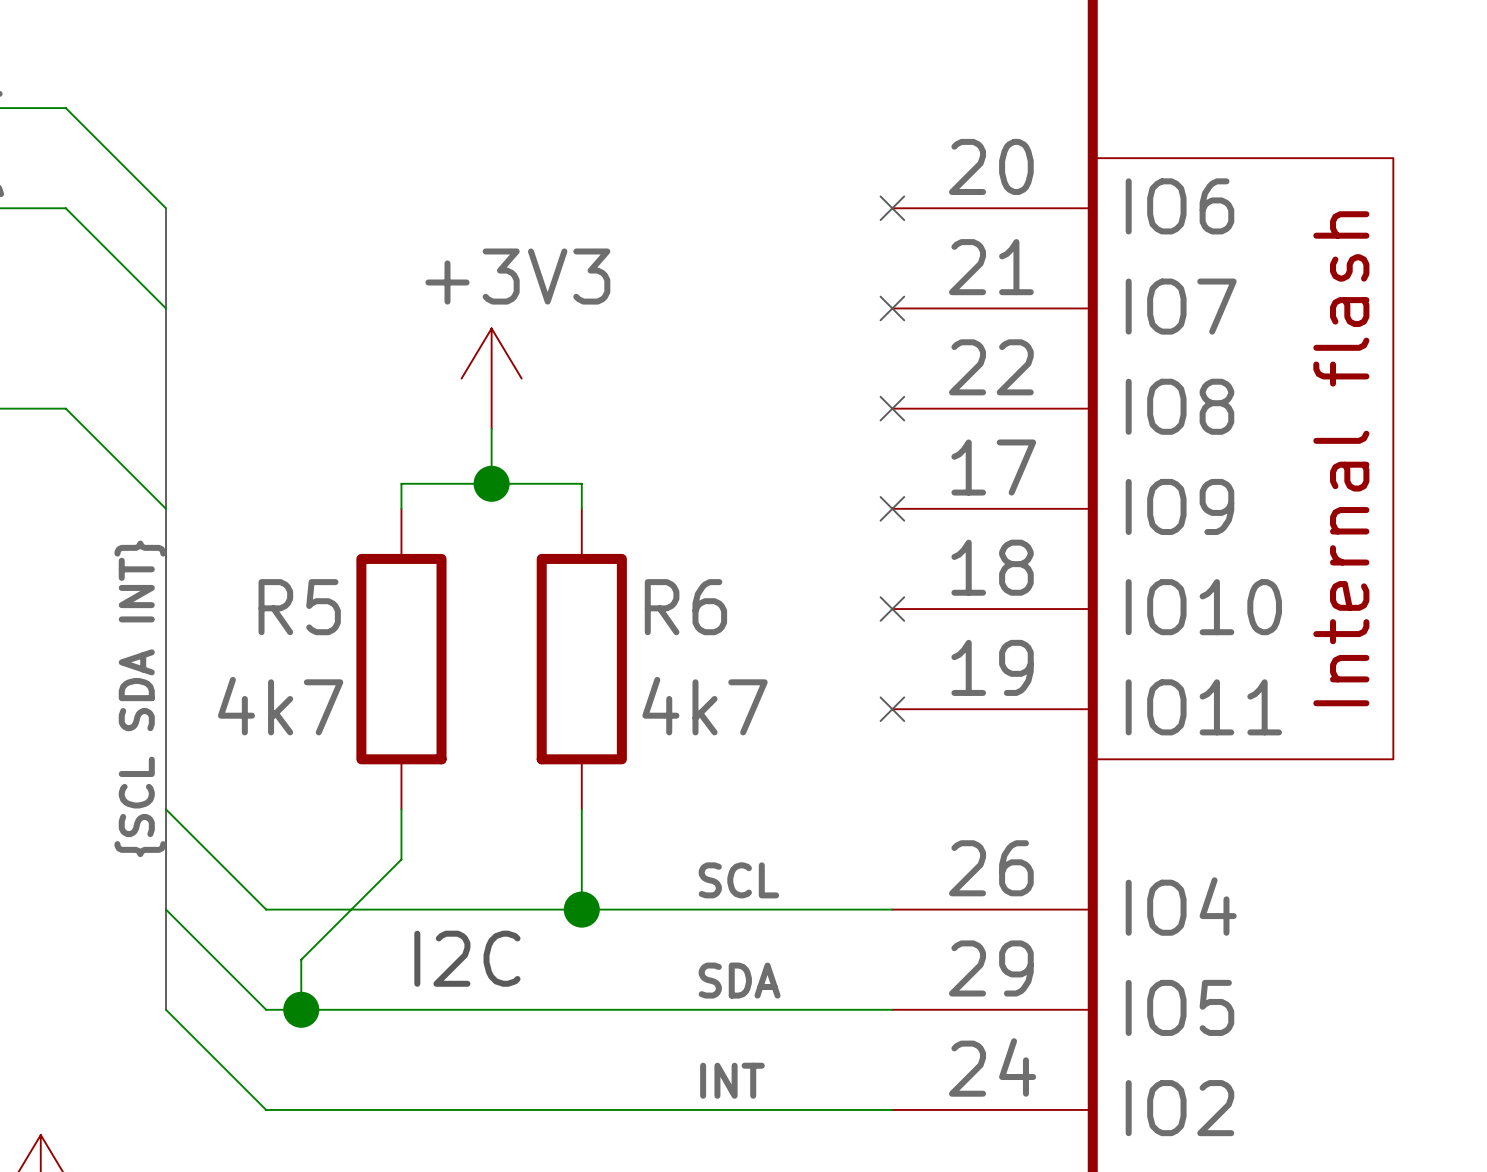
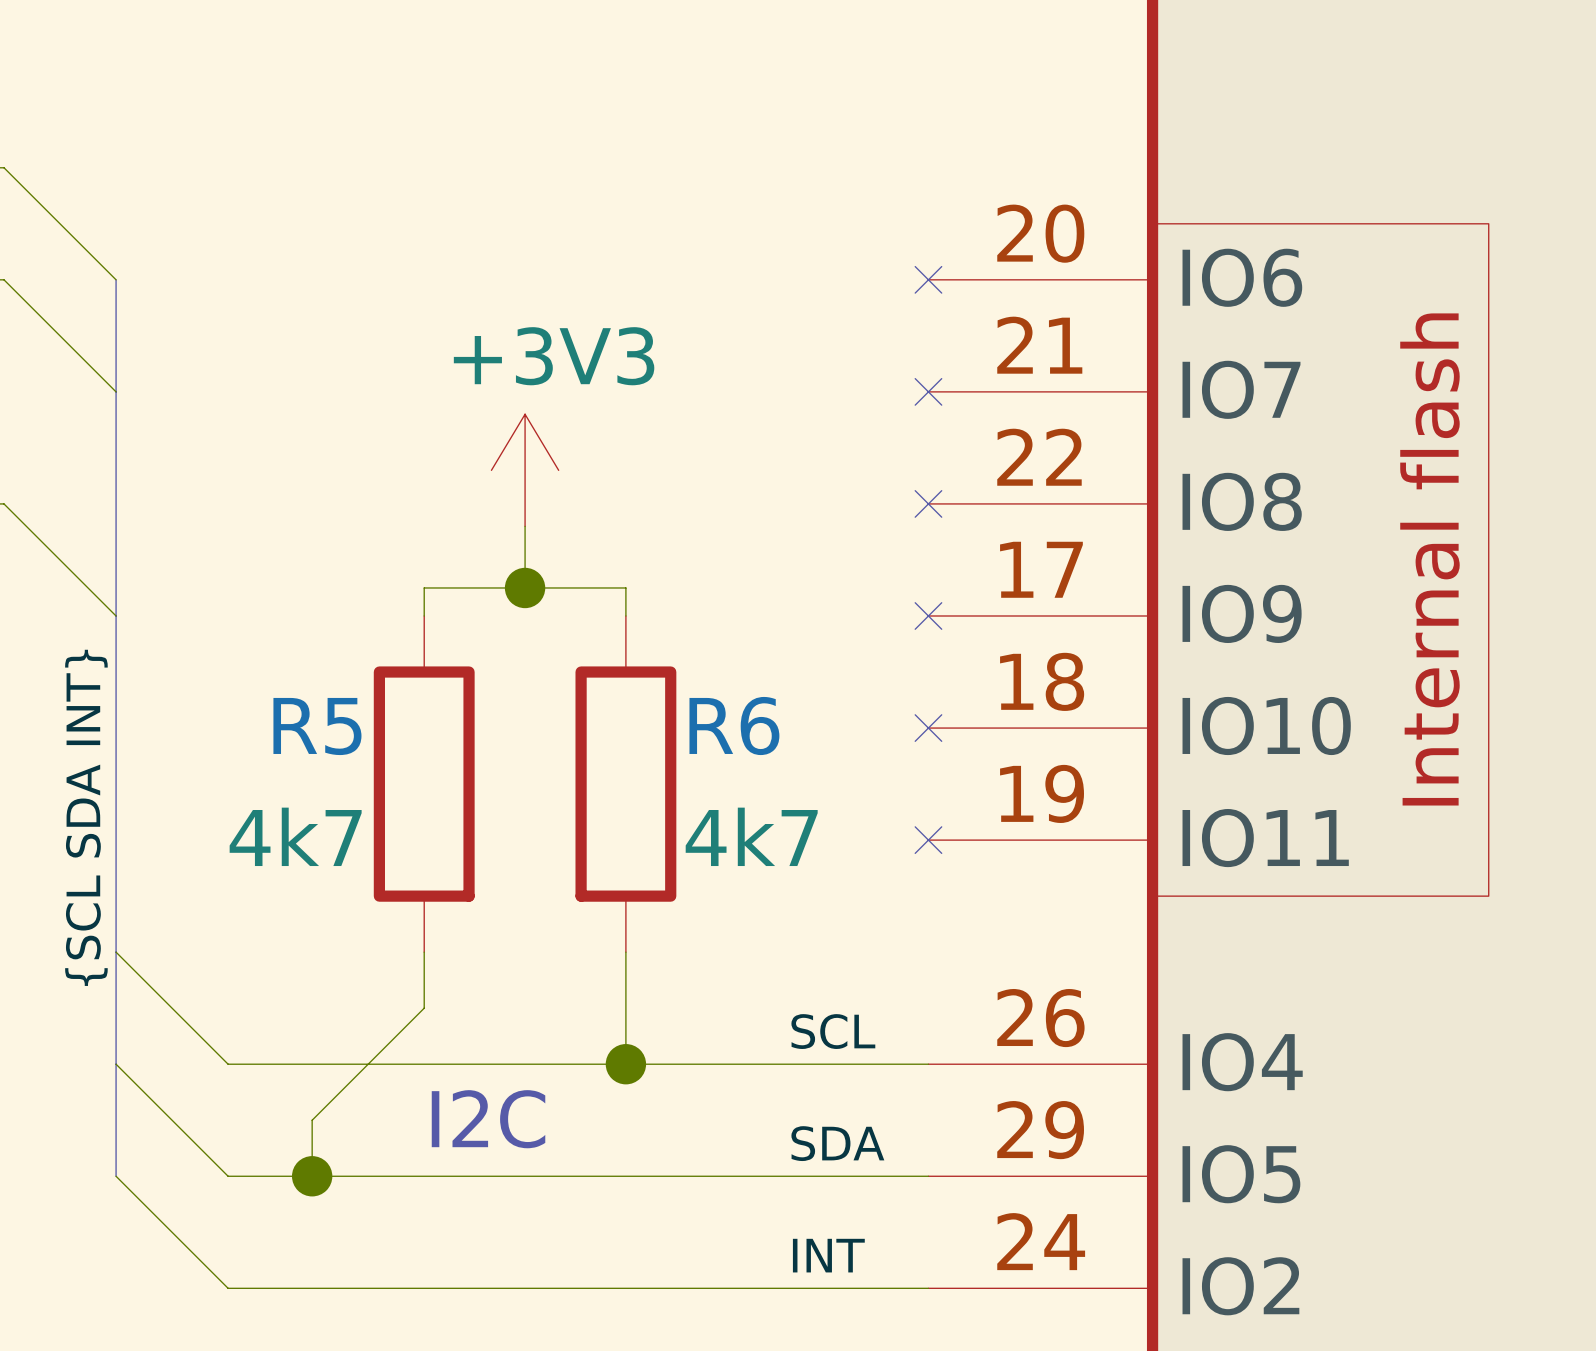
power symbol position: +3V3 (491, 378) -> +3V3 (525, 470)
wire: (491, 428) (491, 483) -> (525, 526) (525, 587)
wire: (441, 483) (401, 483) (401, 508) -> (424, 587) (424, 616)
junction position: (491, 483) -> (525, 587)
wire: (581, 483) (581, 508) -> (581, 587) (625, 587) (625, 616)
R5 position: (401, 659) -> (424, 784)
R6 position: (581, 659) -> (625, 784)
wire: (401, 809) (401, 859) (301, 959) (301, 1009) -> (424, 952) (424, 1008) (312, 1120) (312, 1176)
wire: (581, 809) (581, 909) -> (625, 952) (625, 1064)
label position: SCL (738, 880) -> SCL (833, 1031)
junction position: (581, 909) -> (625, 1064)
text position: I2C (467, 958) -> I2C (488, 1119)
label position: SDA (739, 980) -> SDA (837, 1143)
junction position: (301, 1009) -> (312, 1176)
label position: INT (732, 1080) -> INT (828, 1255)

